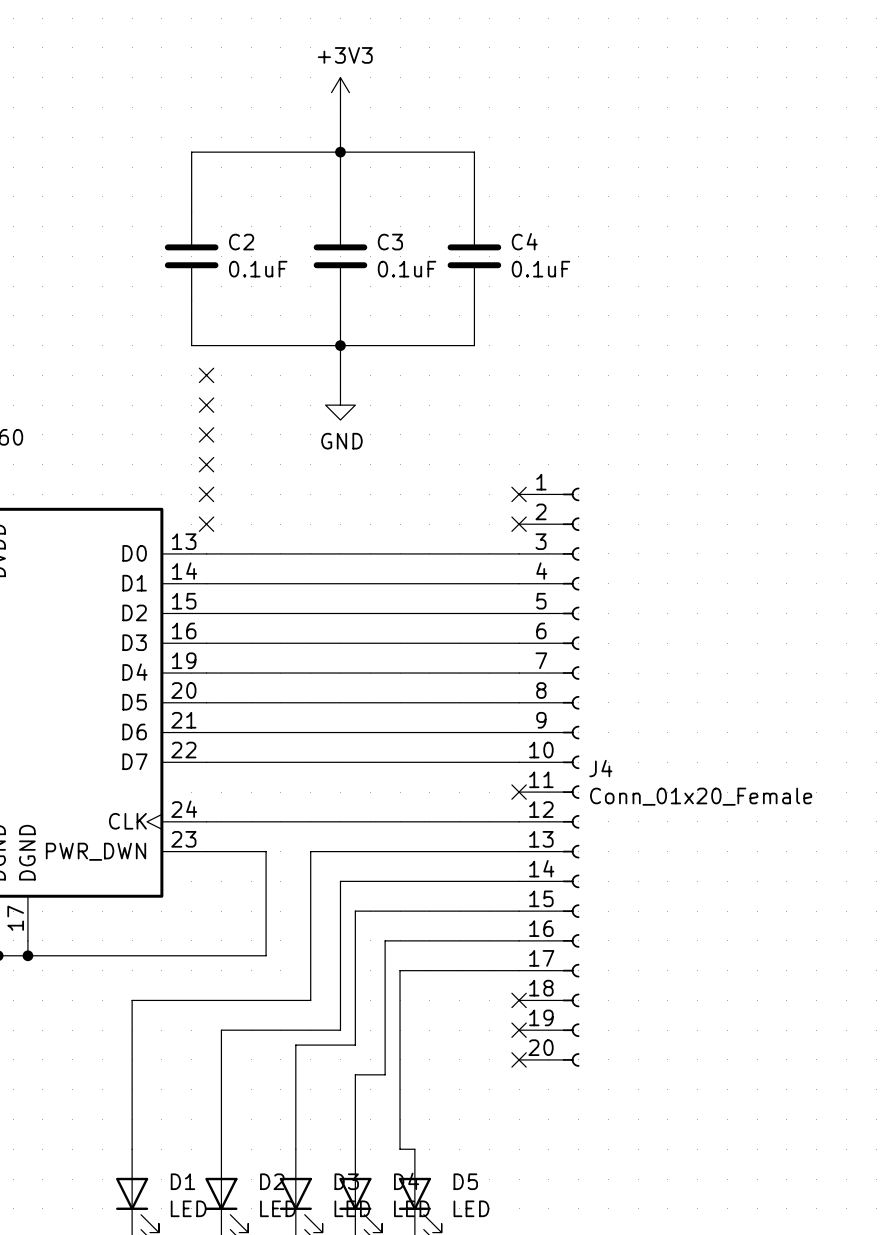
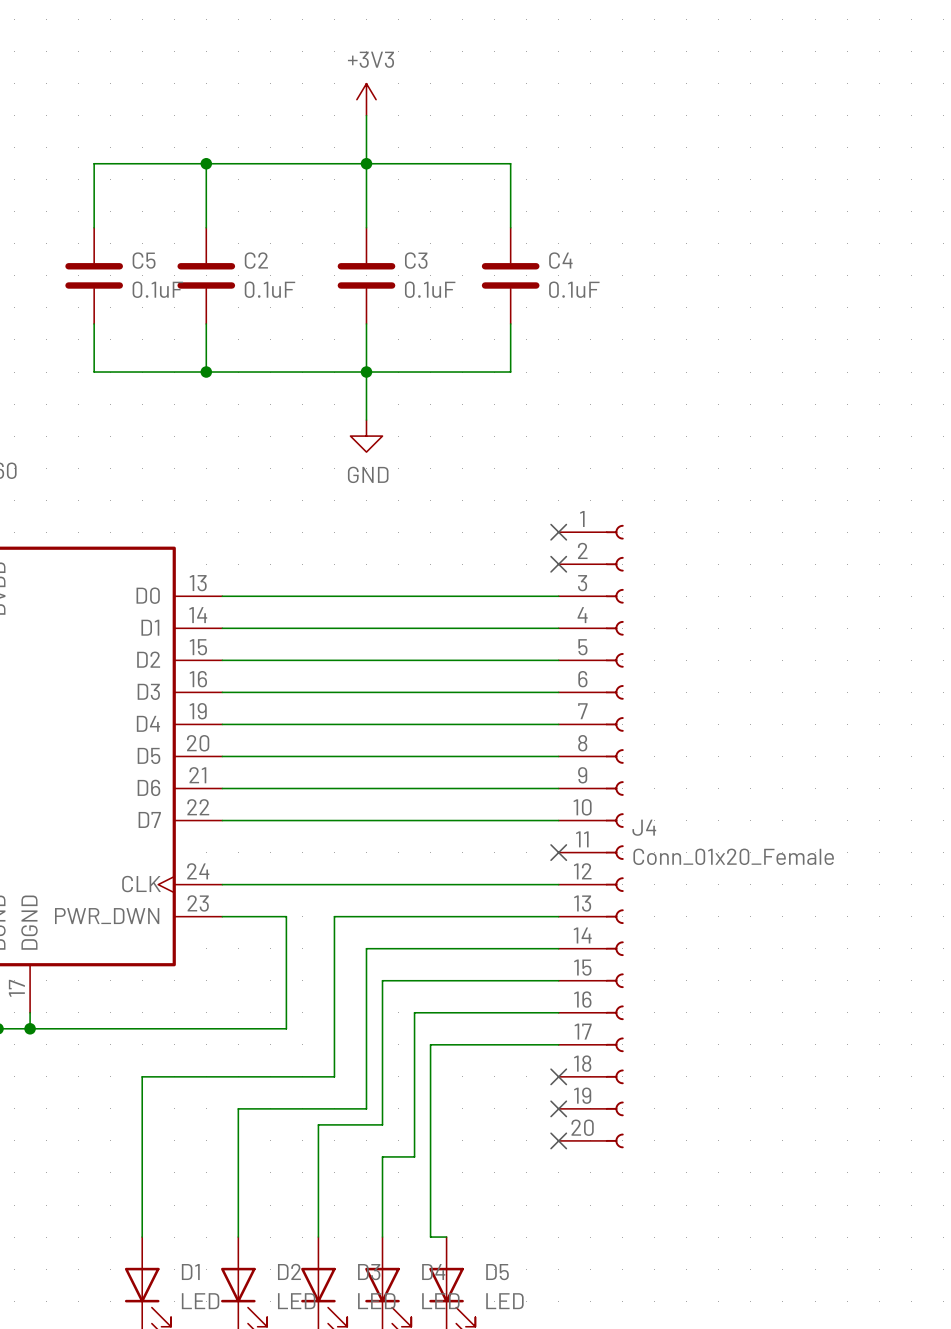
wire: none -> (206, 163) (94, 163) (94, 227)
junction: none -> (206, 163)
C5: none -> 0.1uF (94, 275)
wire: none -> (94, 323) (94, 372) (206, 372)
junction: none -> (206, 372)
no-connect mark: (206, 375) -> none
no-connect mark: (206, 405) -> none
no-connect mark: (206, 434) -> none
no-connect mark: (206, 464) -> none
no-connect mark: (206, 494) -> none
no-connect mark: (206, 524) -> none

